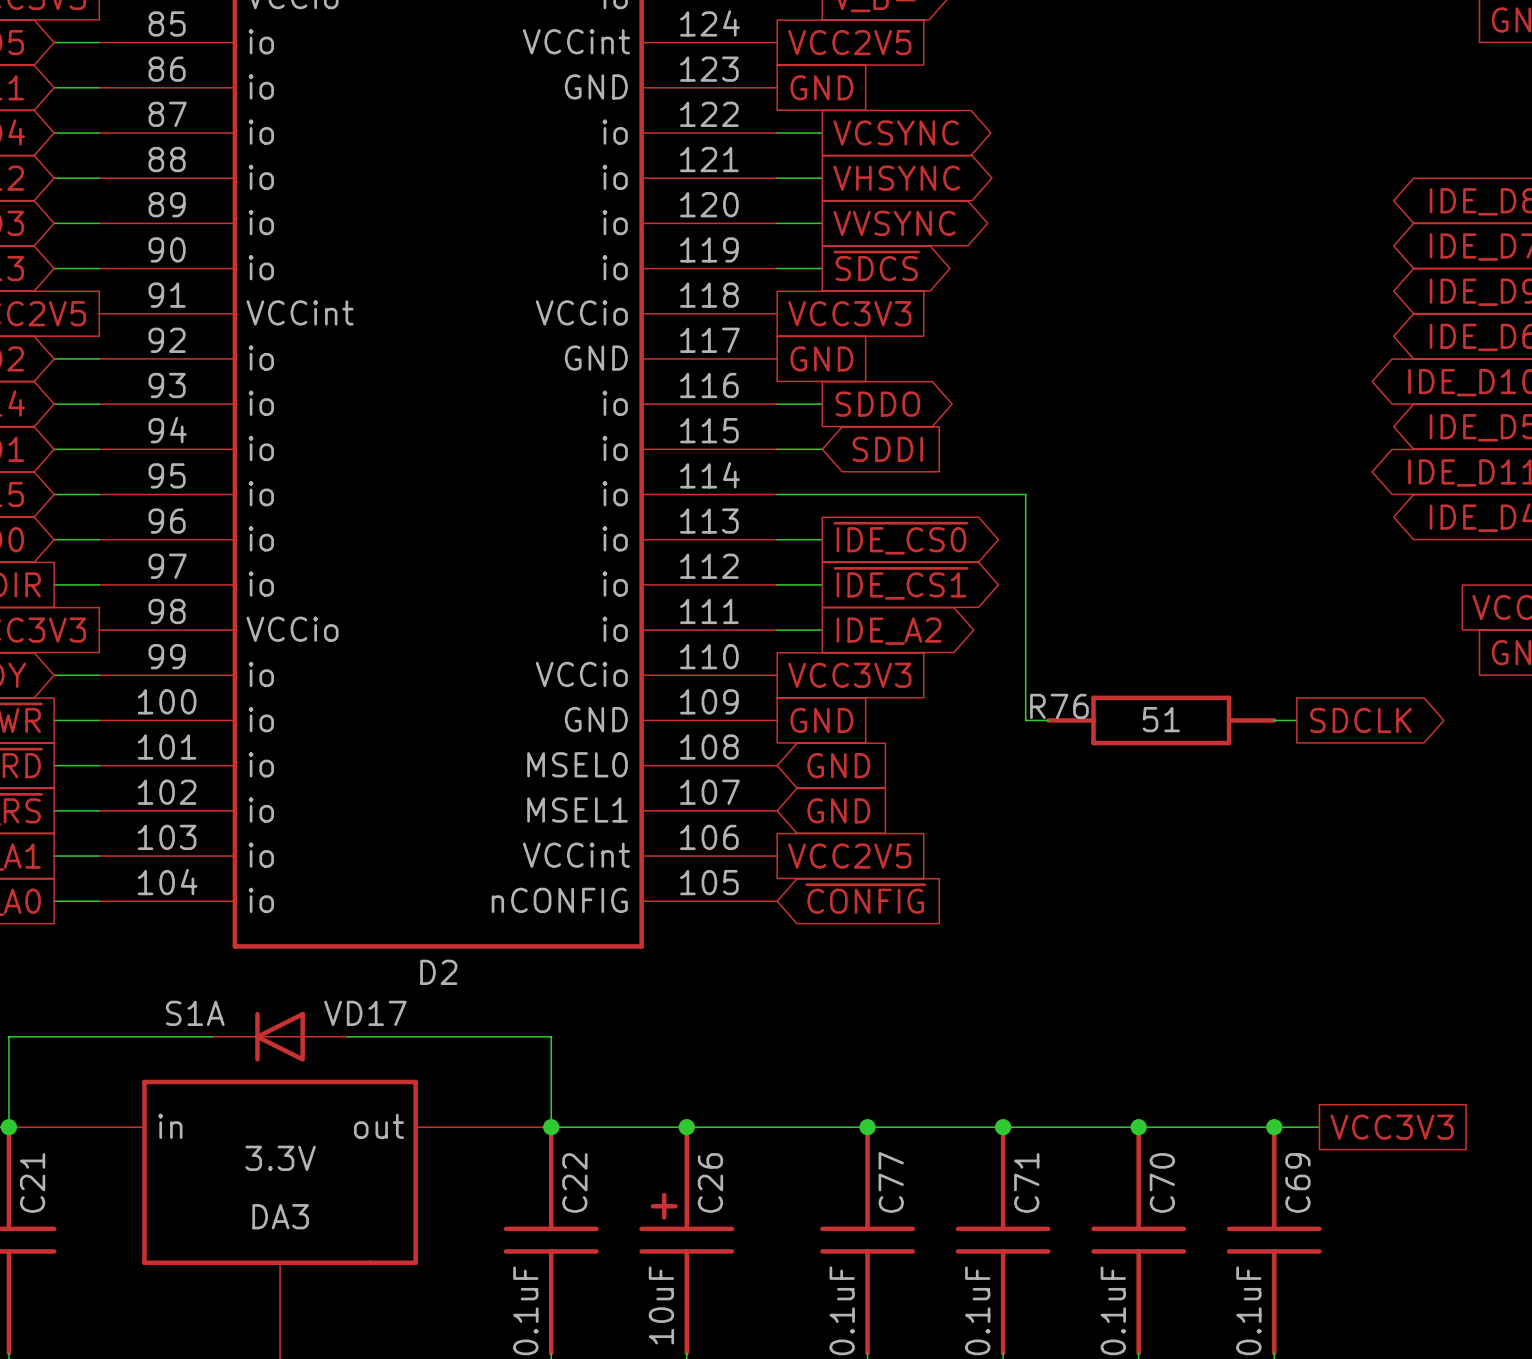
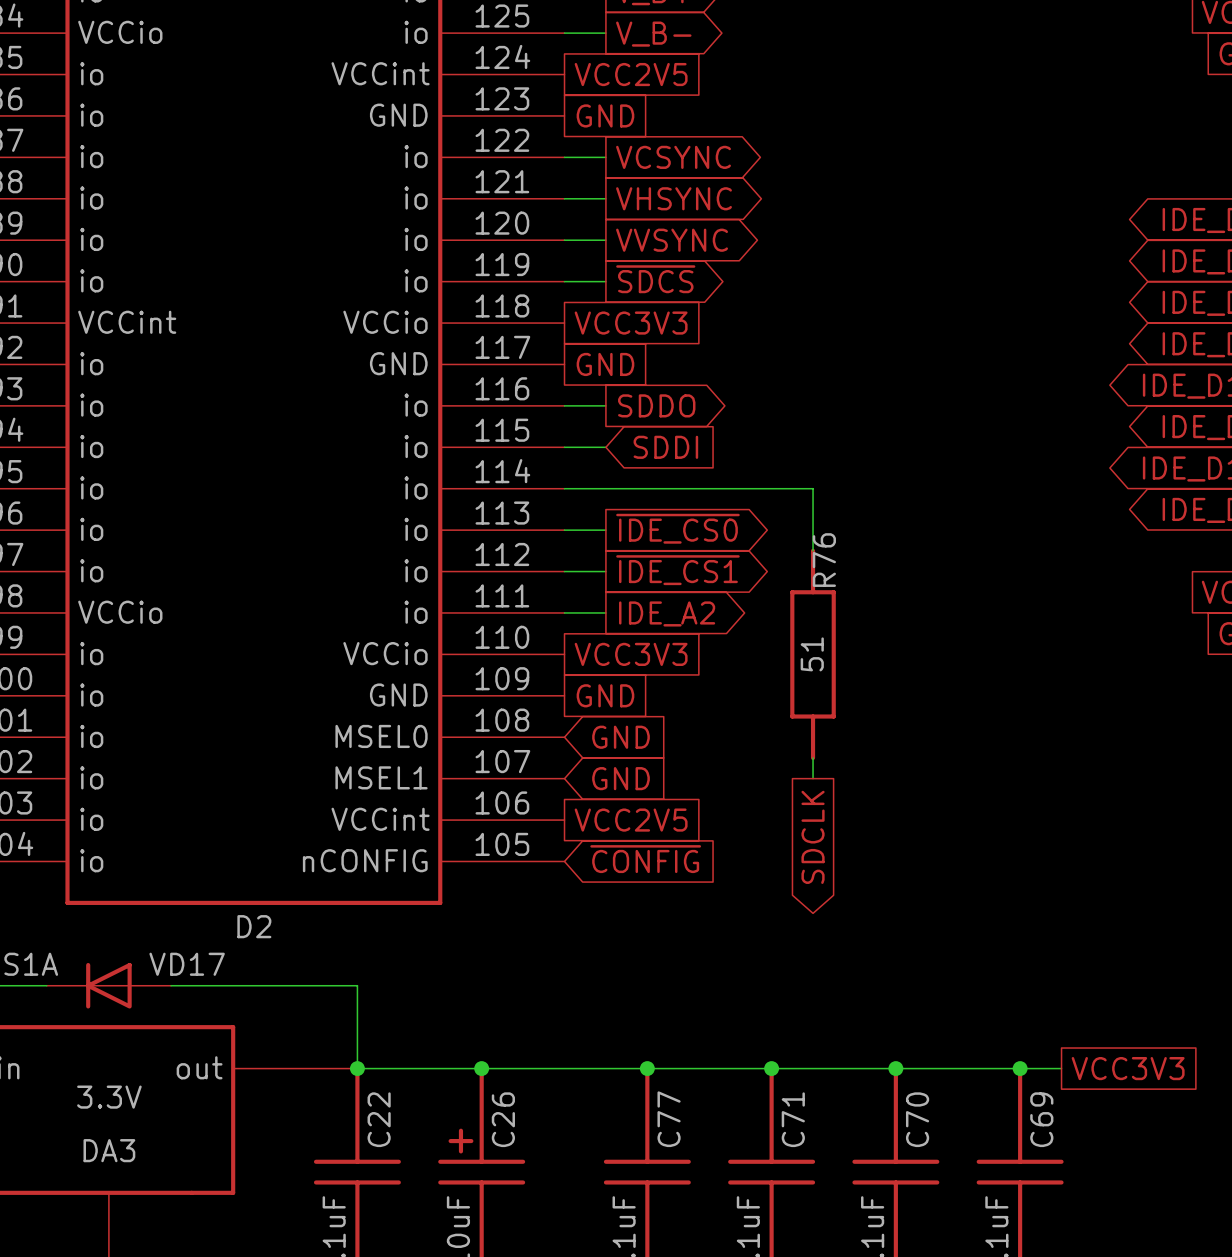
wire: (1025, 494) (1025, 720) (1048, 720) -> (792, 488) (813, 488) (813, 550)
R76 rotation: 0° (1161, 720) -> 90° clockwise (813, 654)
wire: (1274, 720) (1296, 720) -> none
global label rotation: 0° (1360, 720) -> 90° clockwise (813, 837)
global label position: SDCLK (1360, 720) -> SDCLK (813, 837)
wire: none -> (813, 757) (813, 778)

